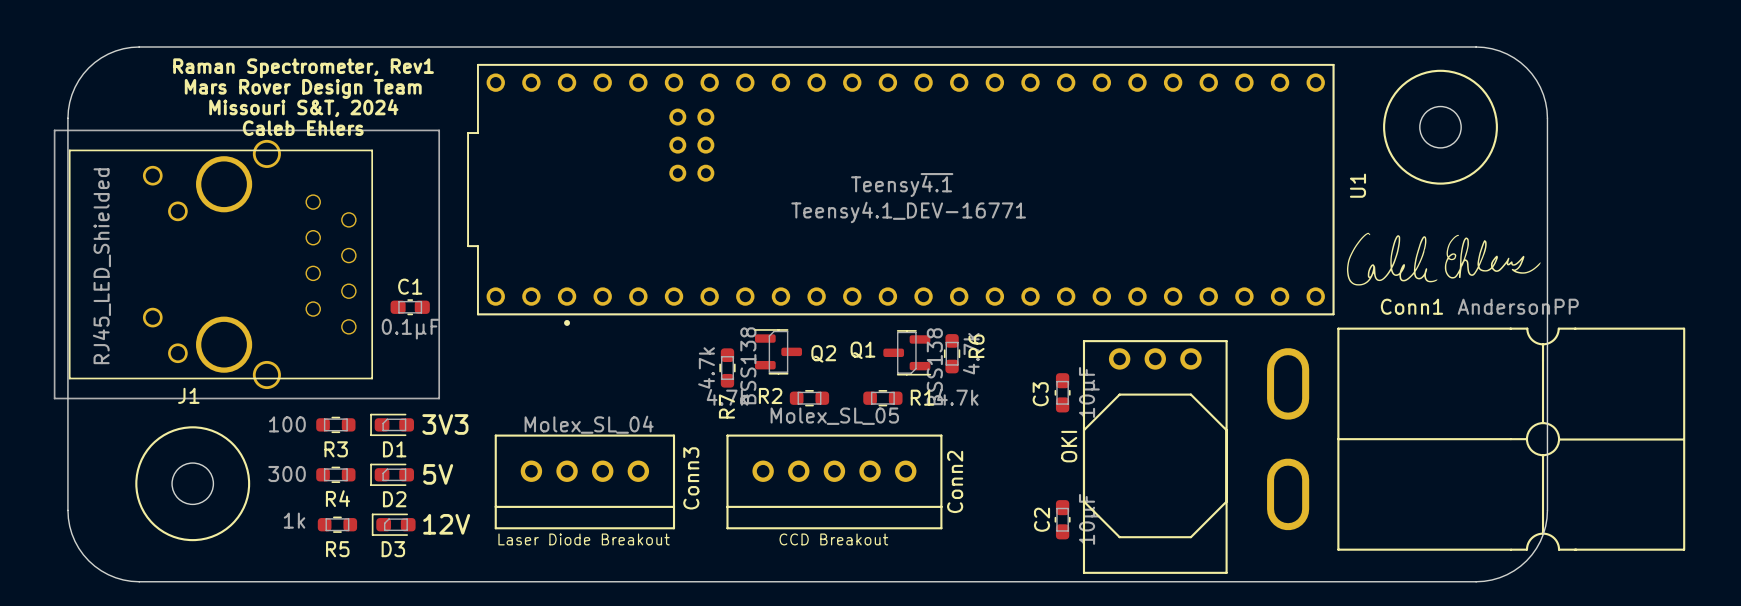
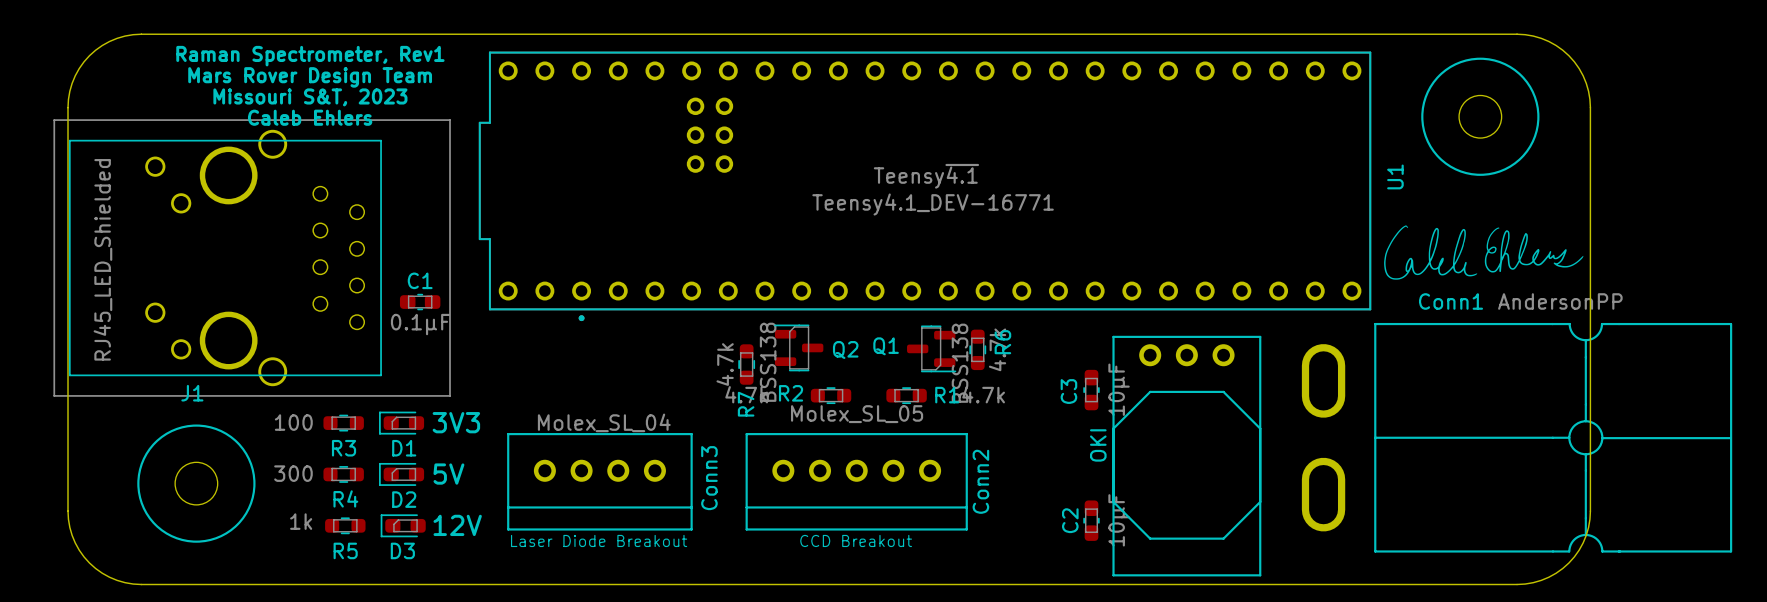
text: Missouri S&T, 2024 (303, 108) -> Missouri S&T, 2023 (310, 97)

